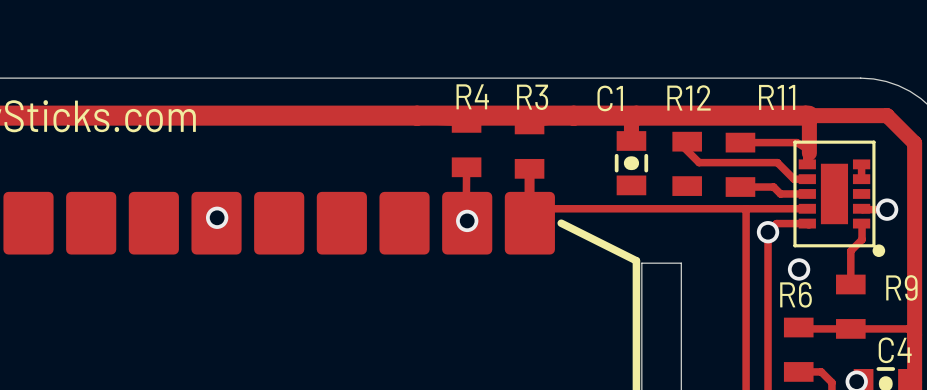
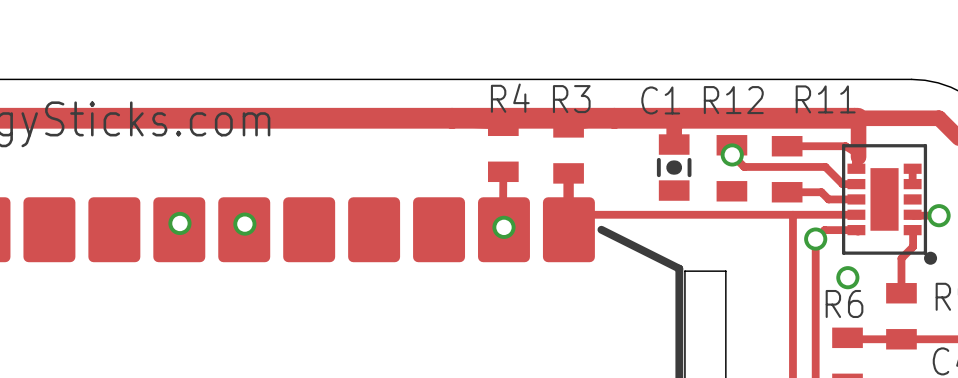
via: none -> (732, 154)
via: none -> (179, 223)

